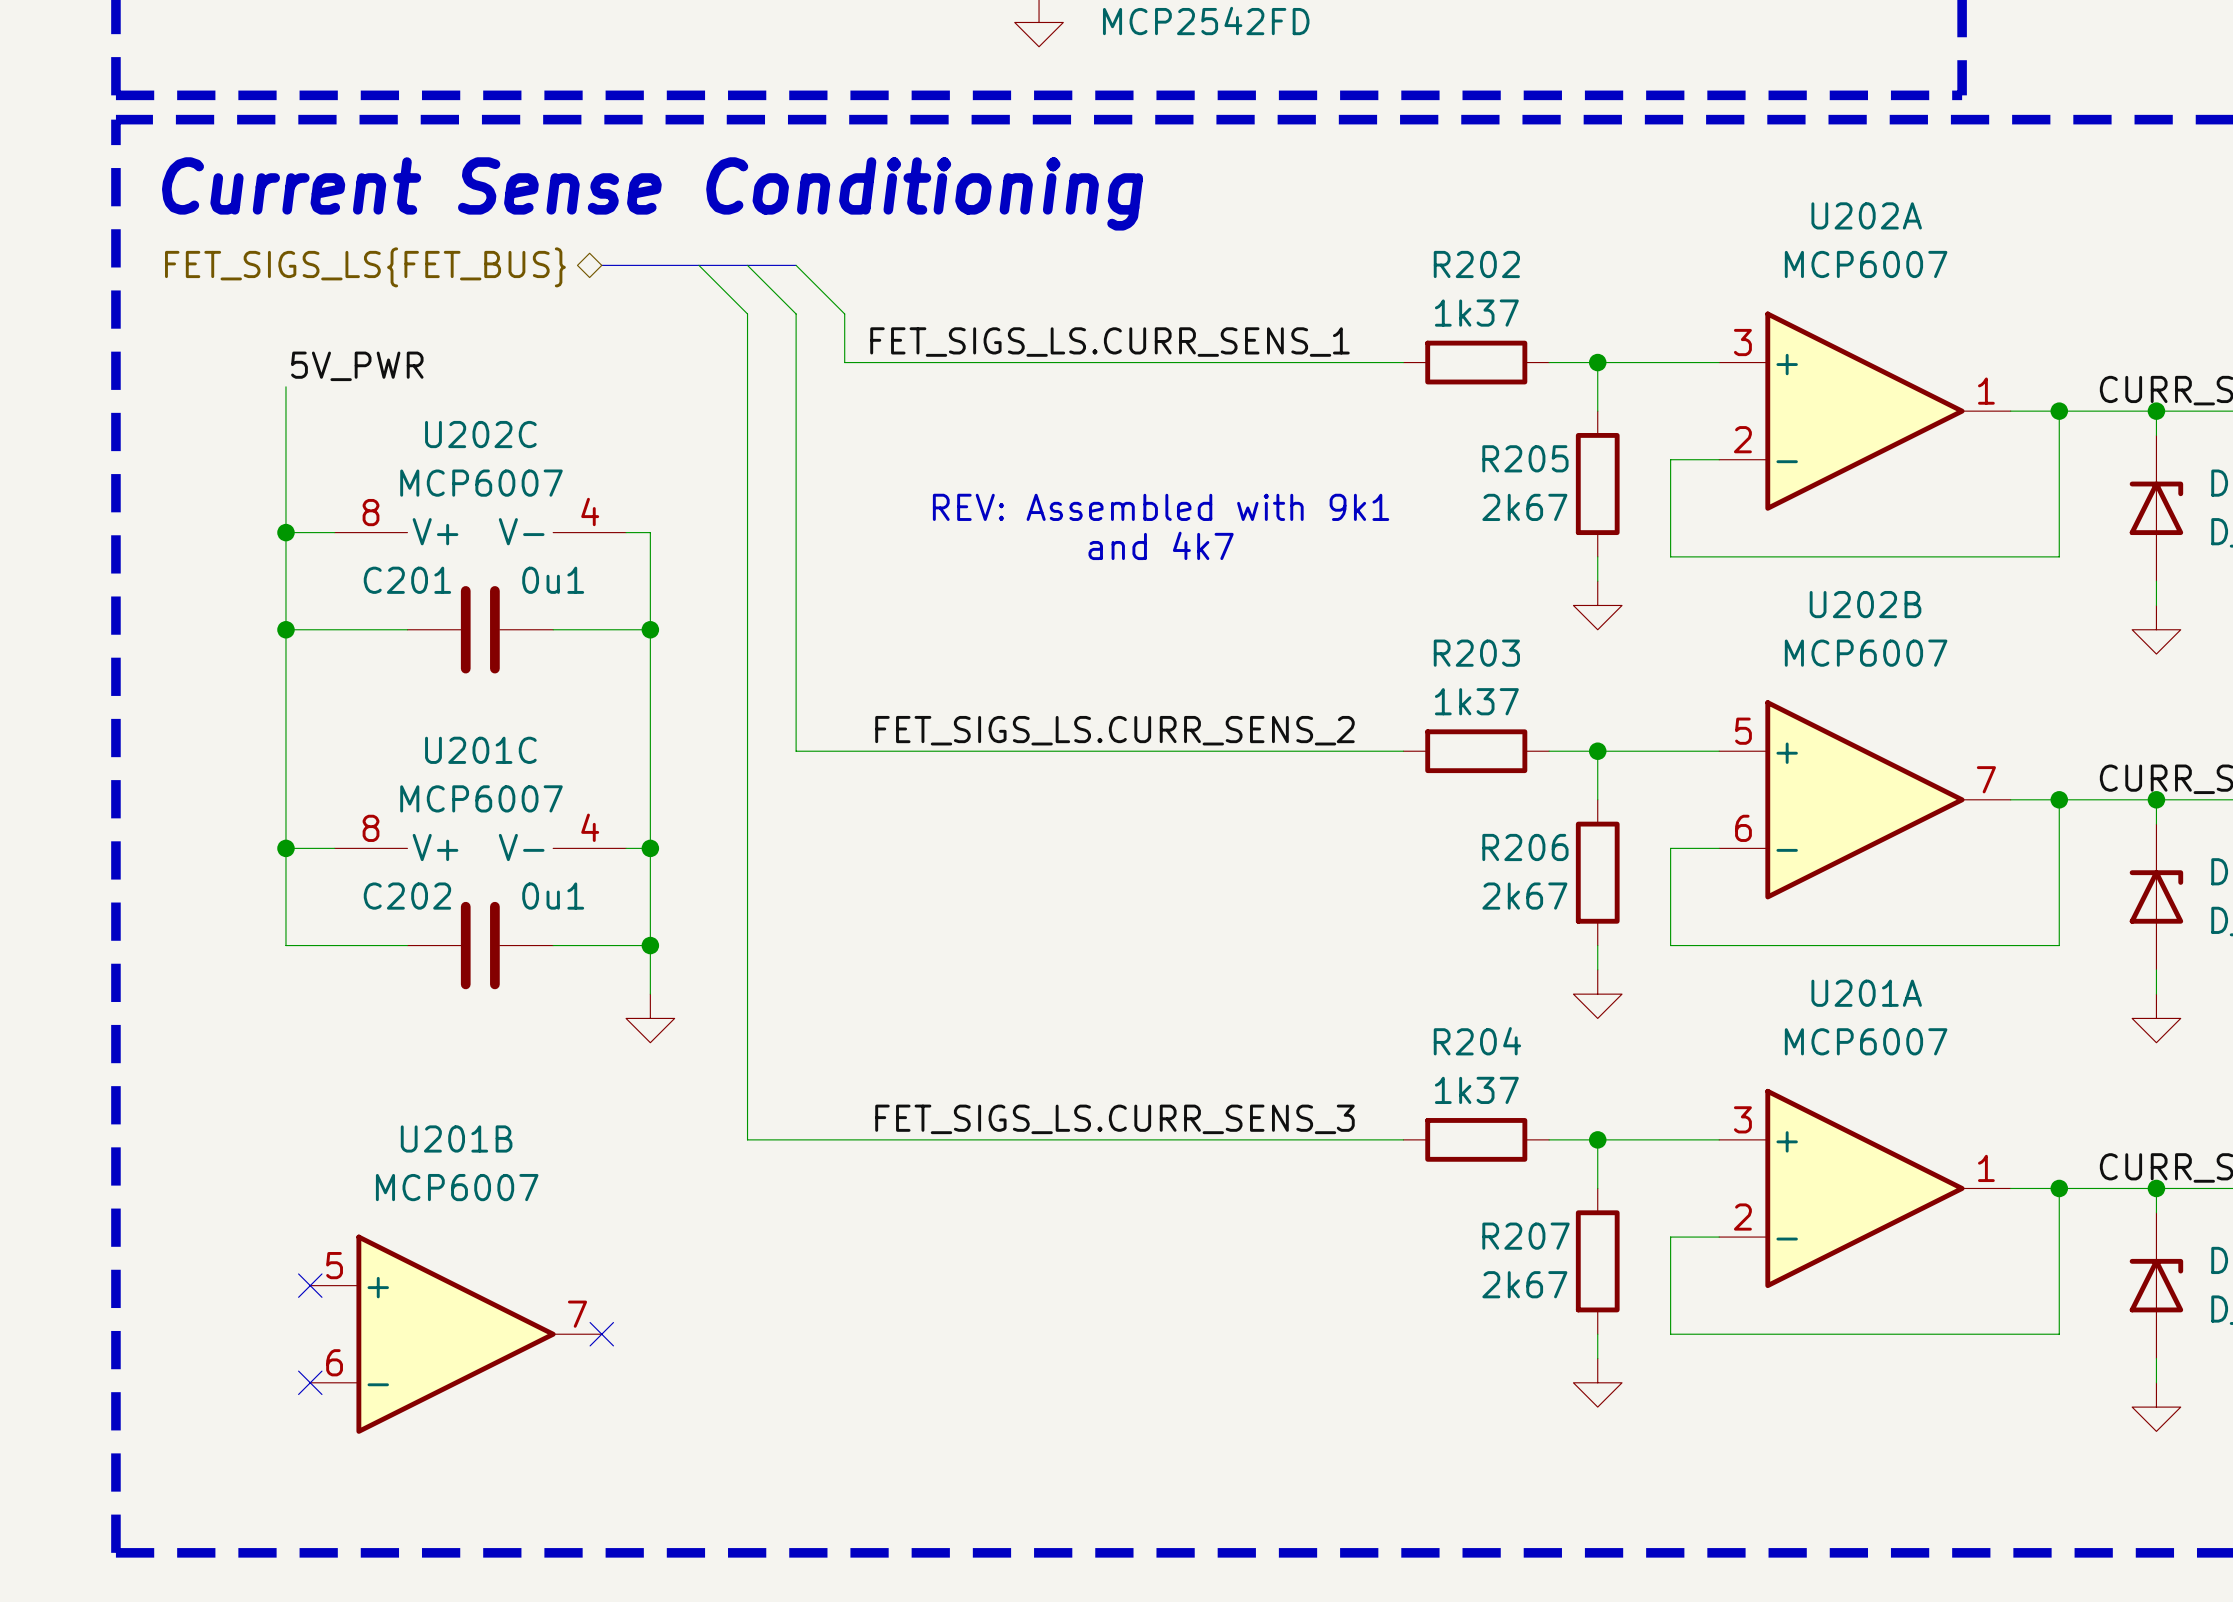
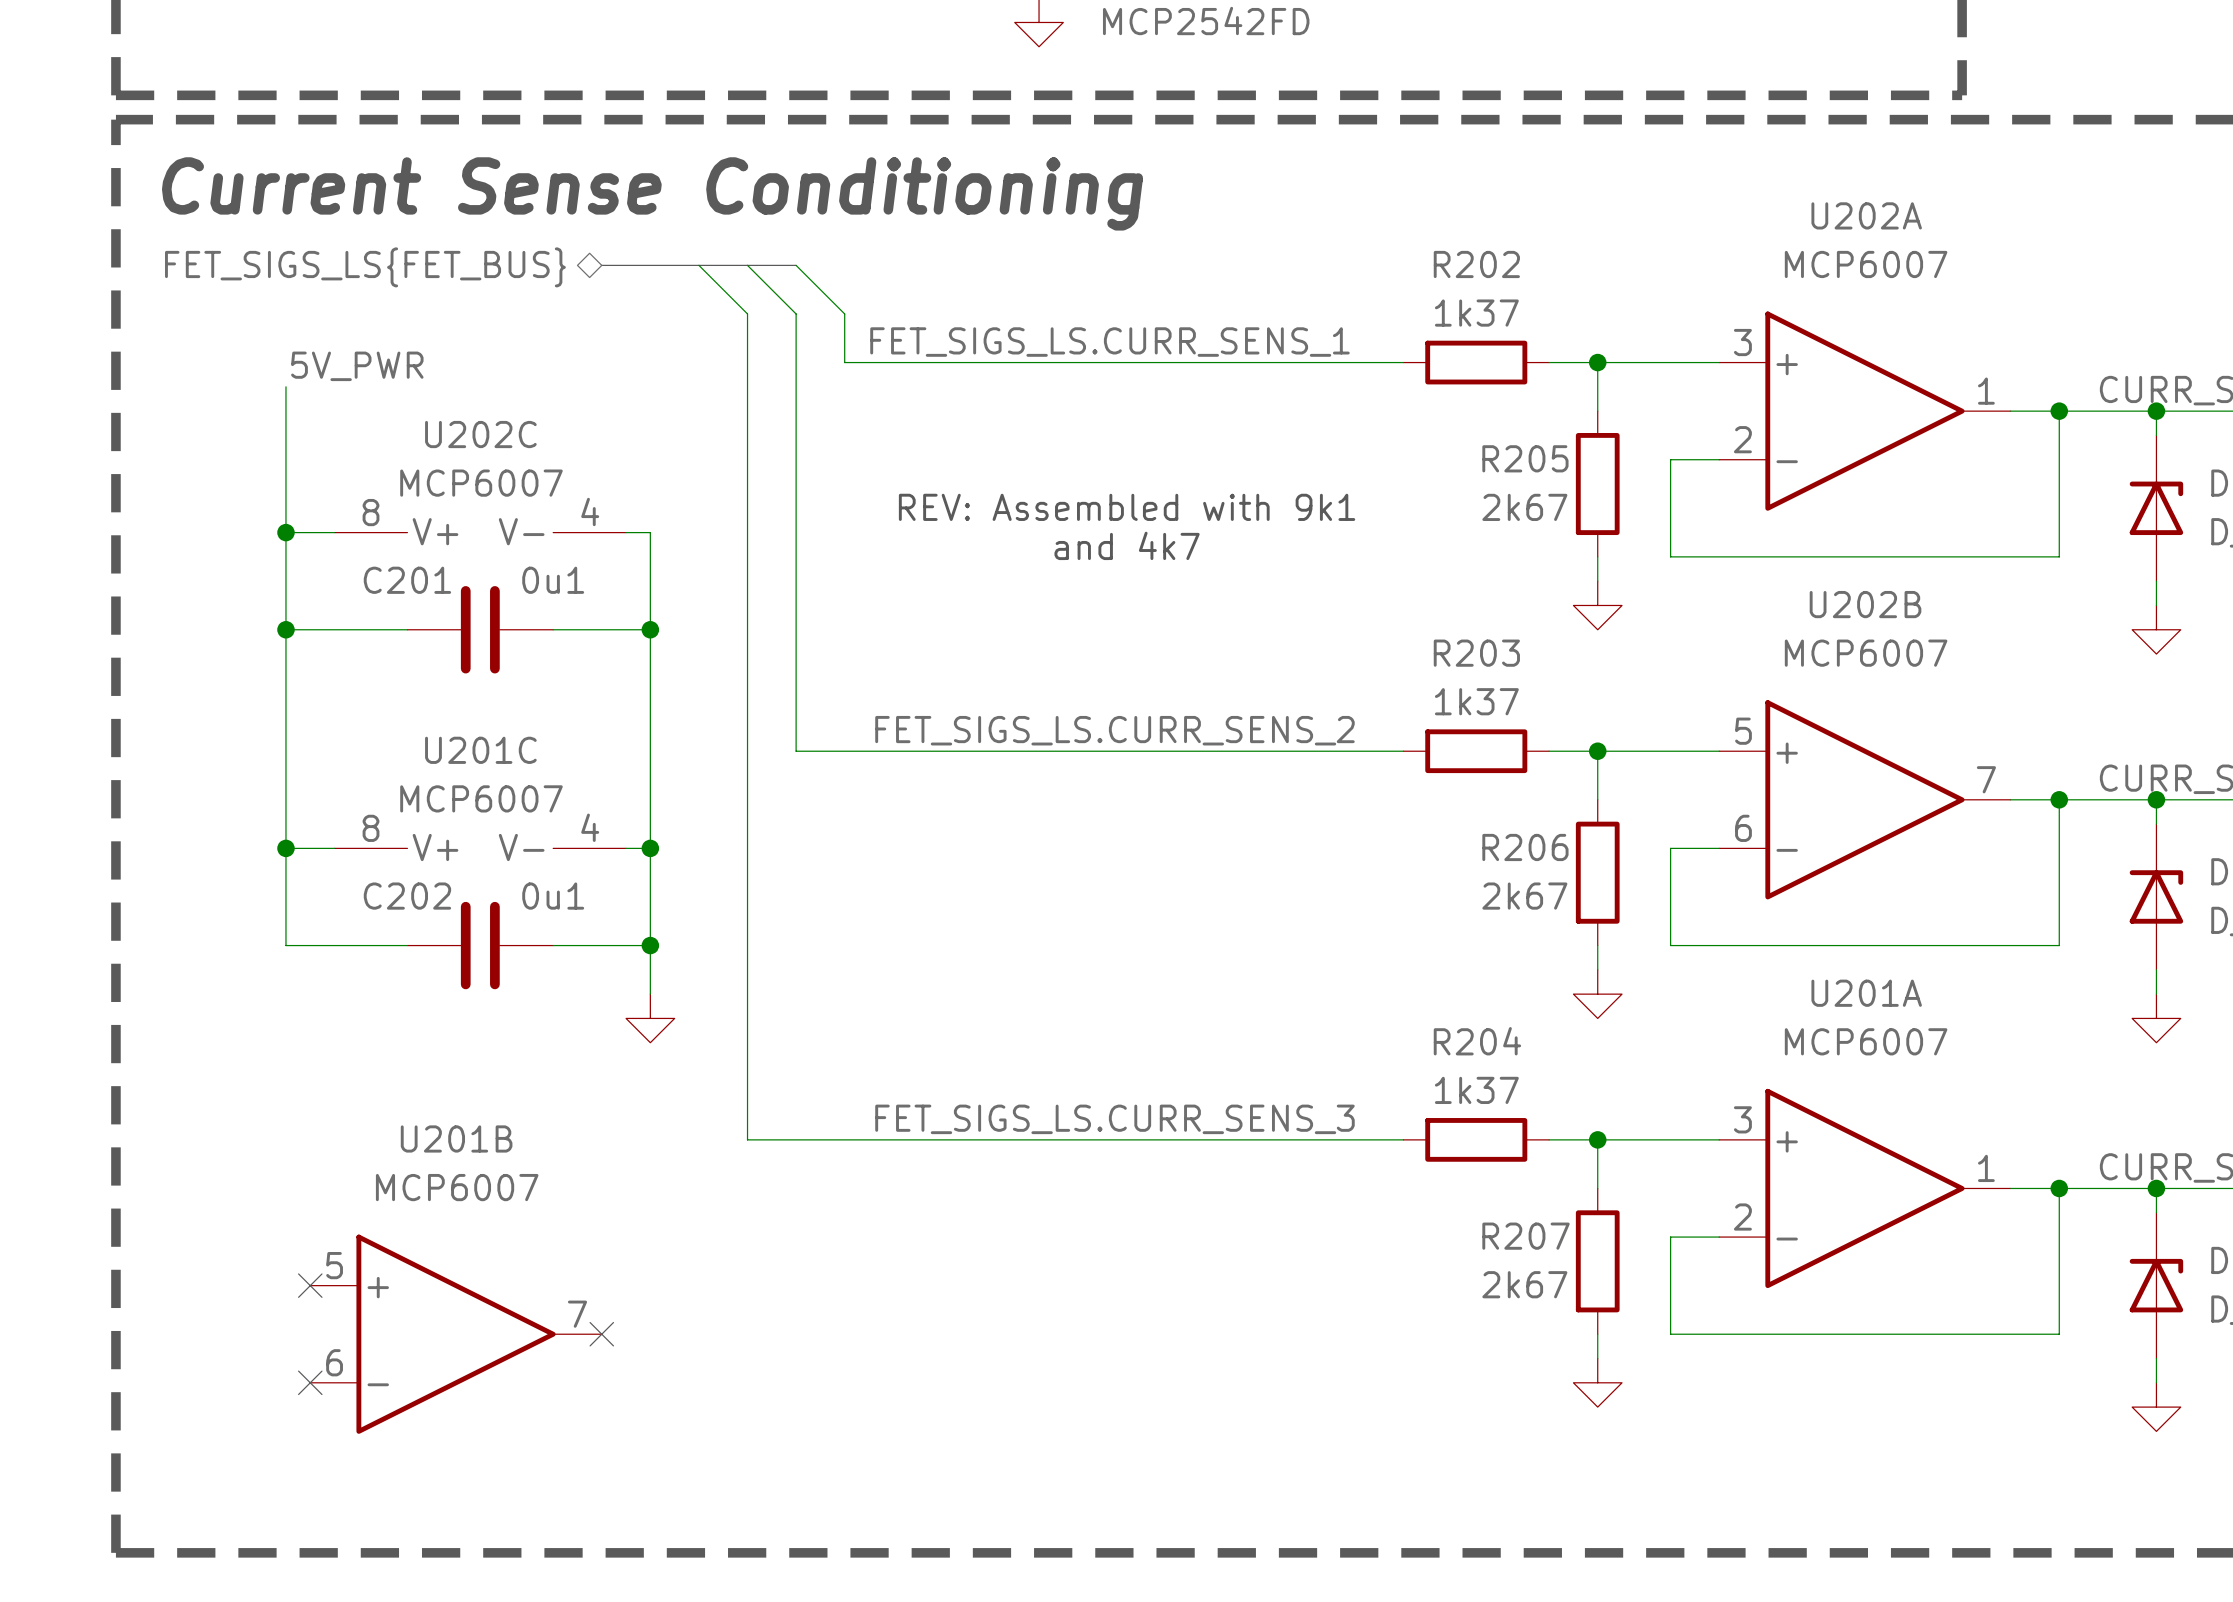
text position: REV: Assembled with 9k1 (1161, 507) -> REV: Assembled with 9k1 (1127, 507)
text position: and 4k7 (1161, 545) -> and 4k7 (1127, 545)

